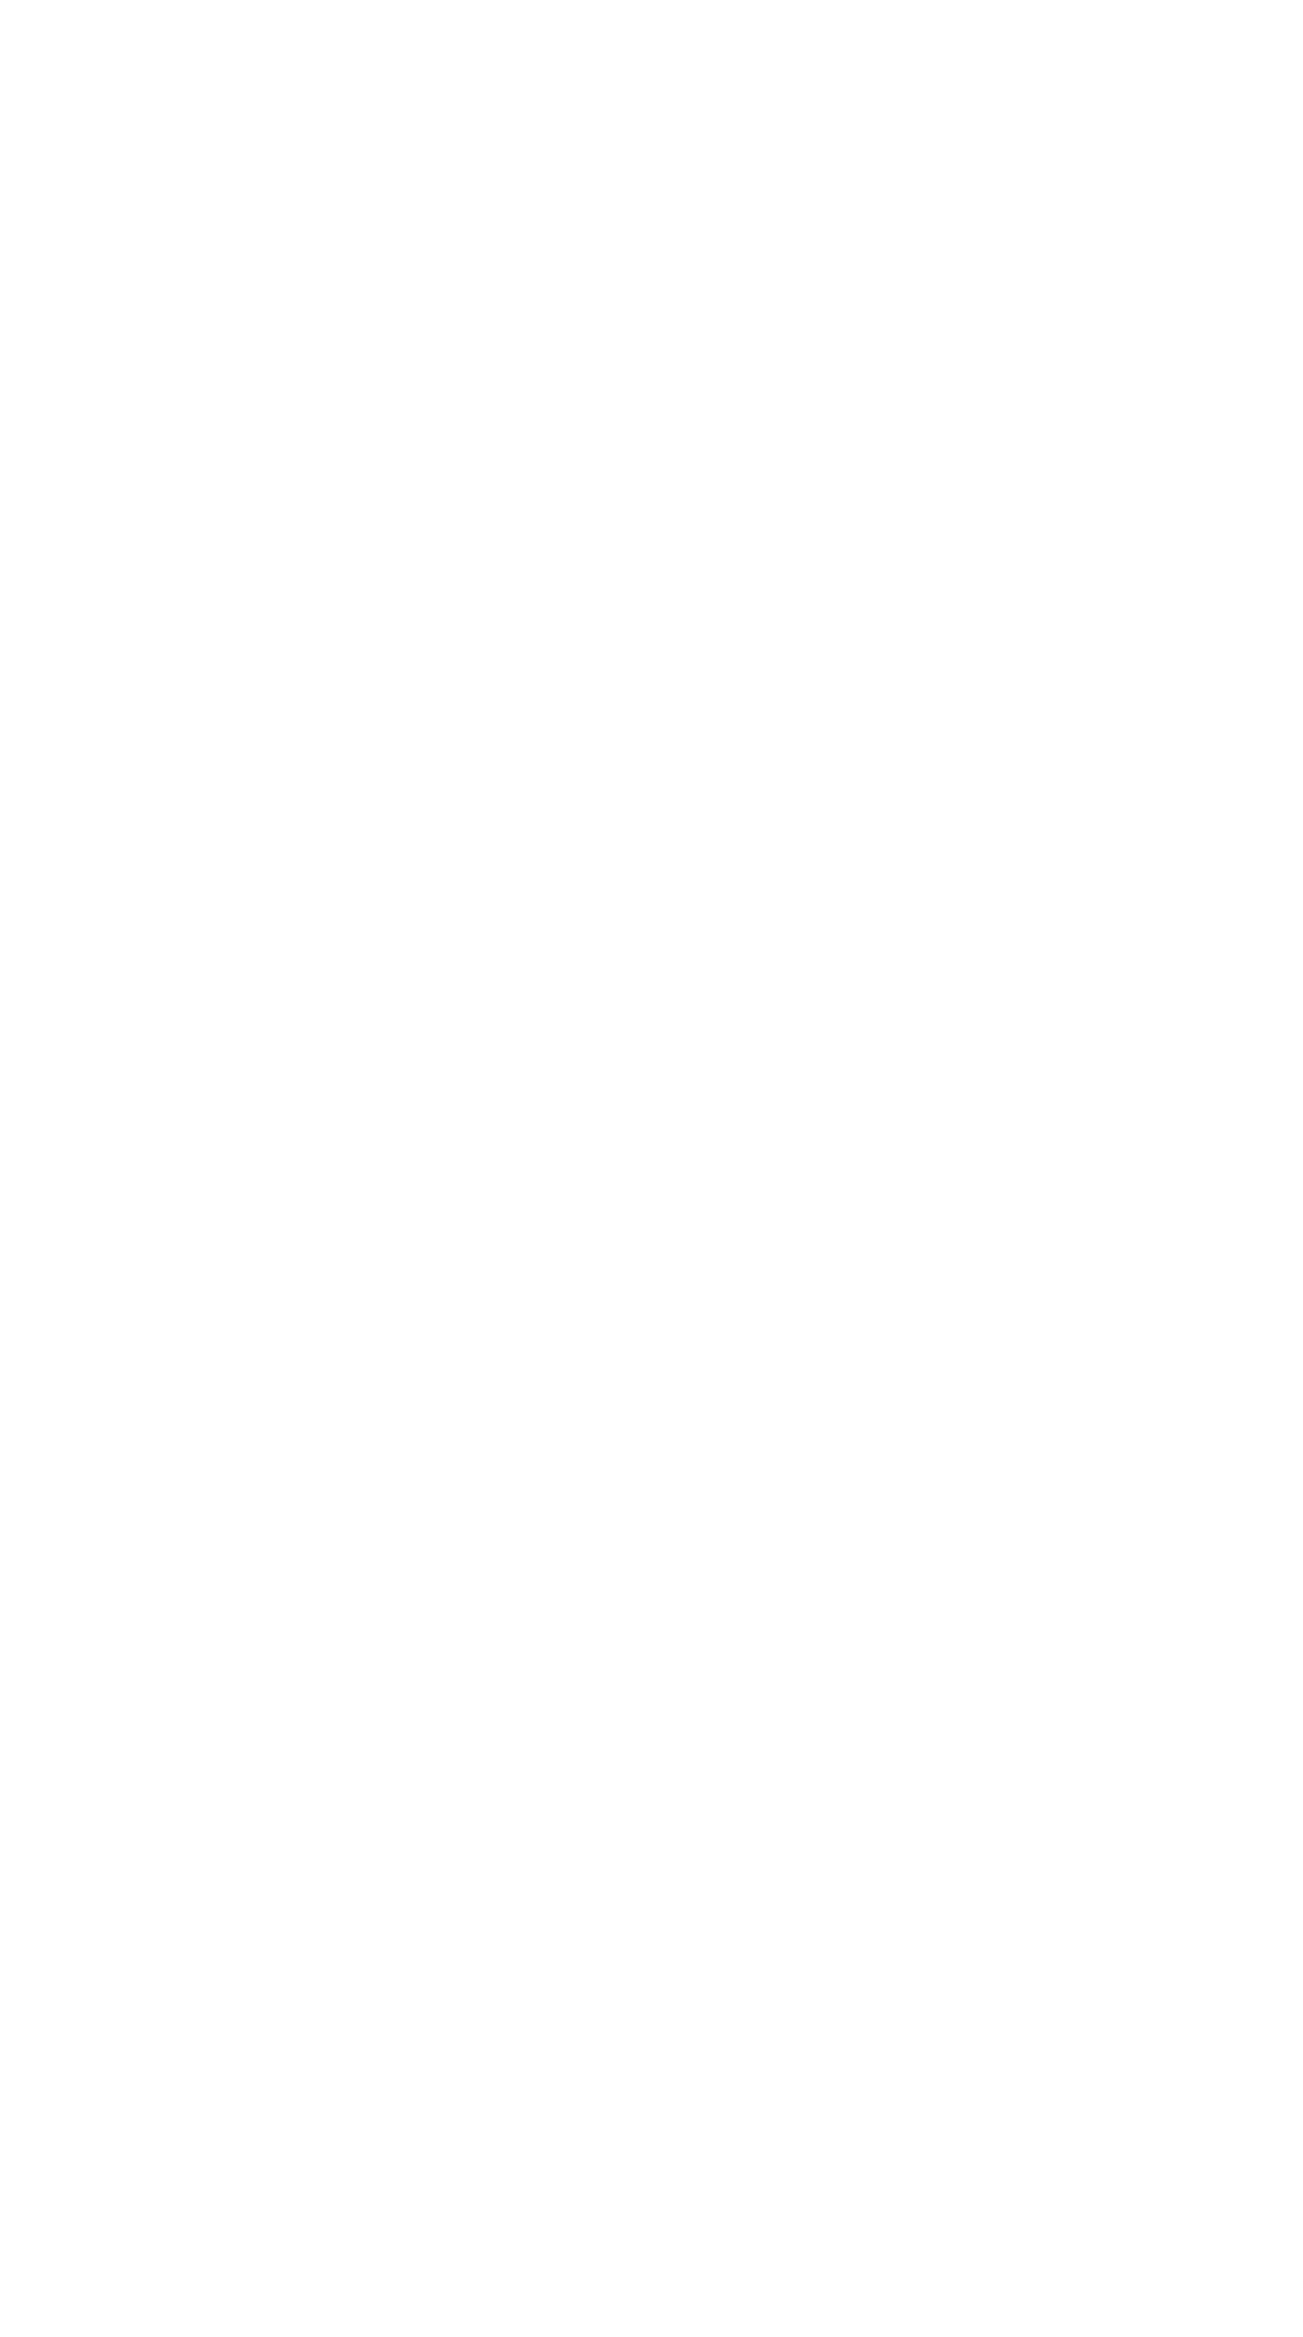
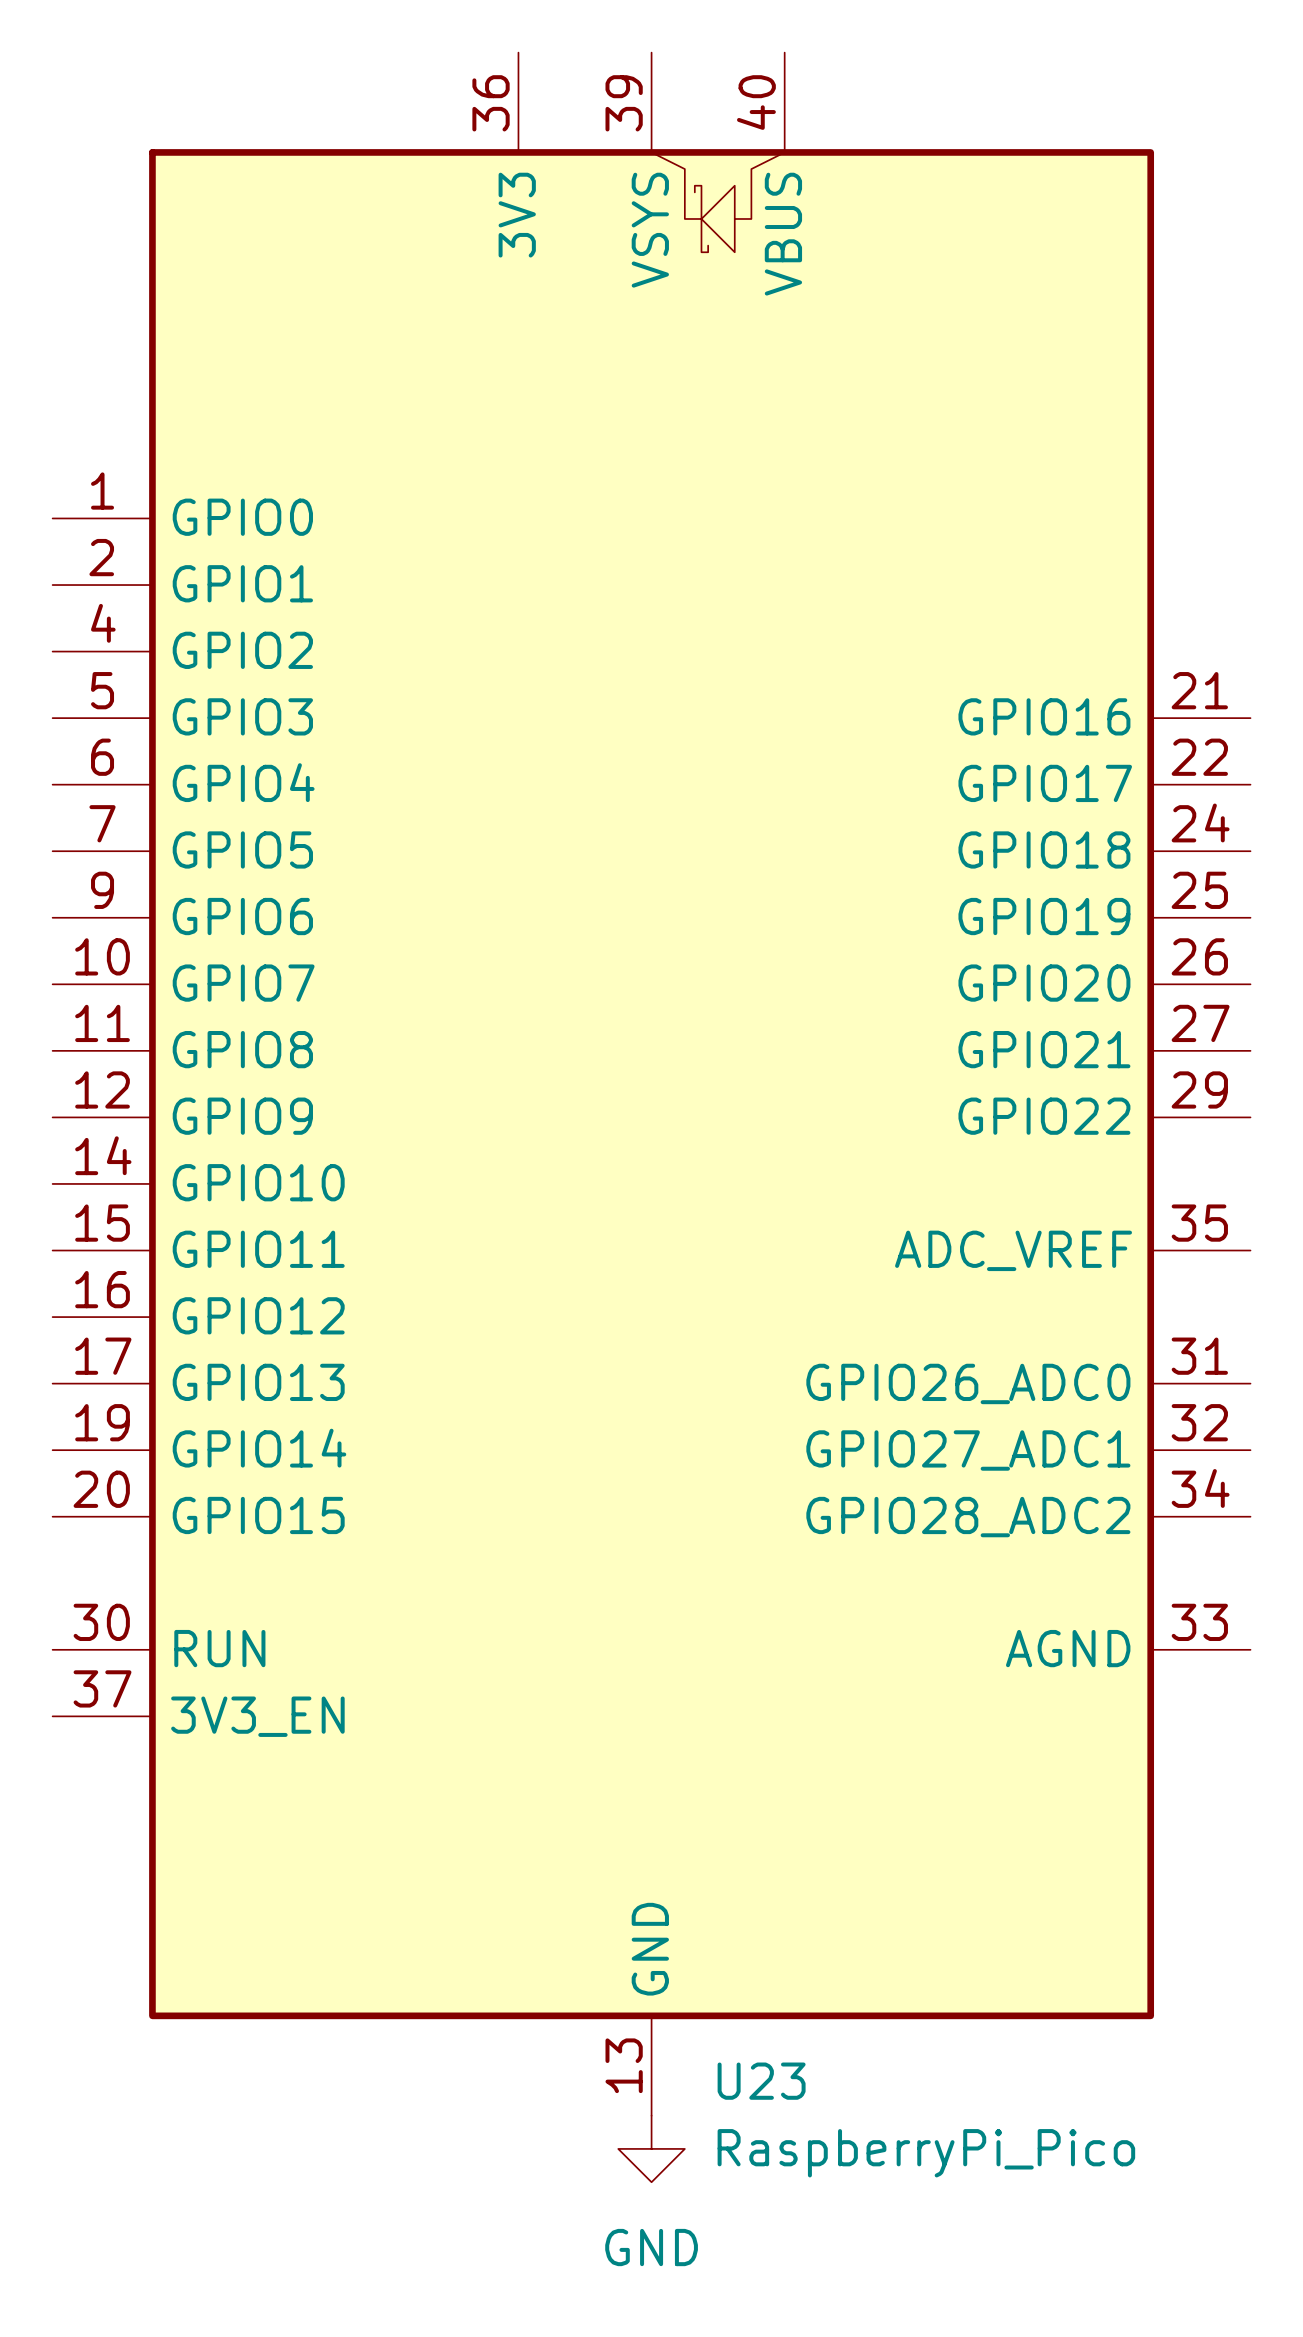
U23: none -> RaspberryPi_Pico (651, 1084)
power symbol: none -> GND (651, 2148)

